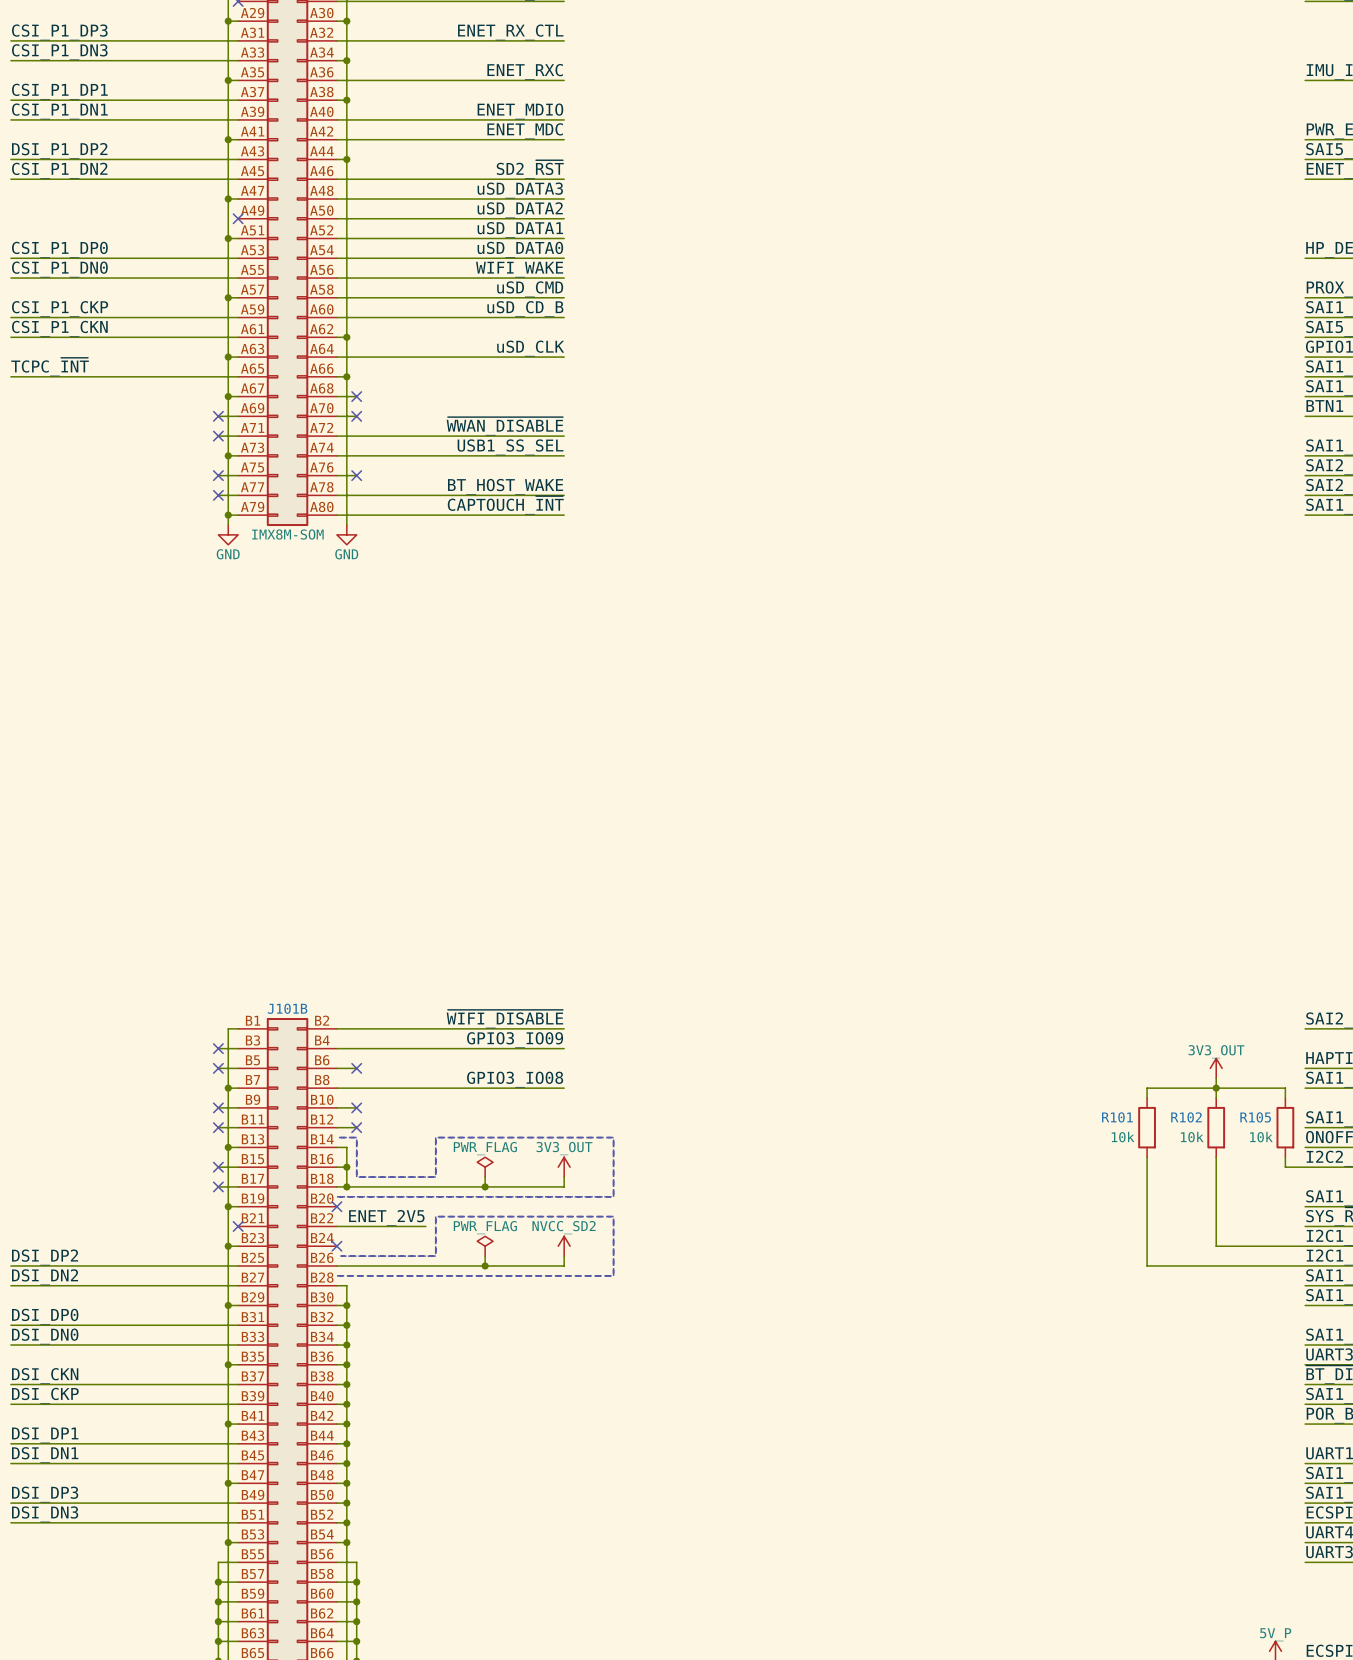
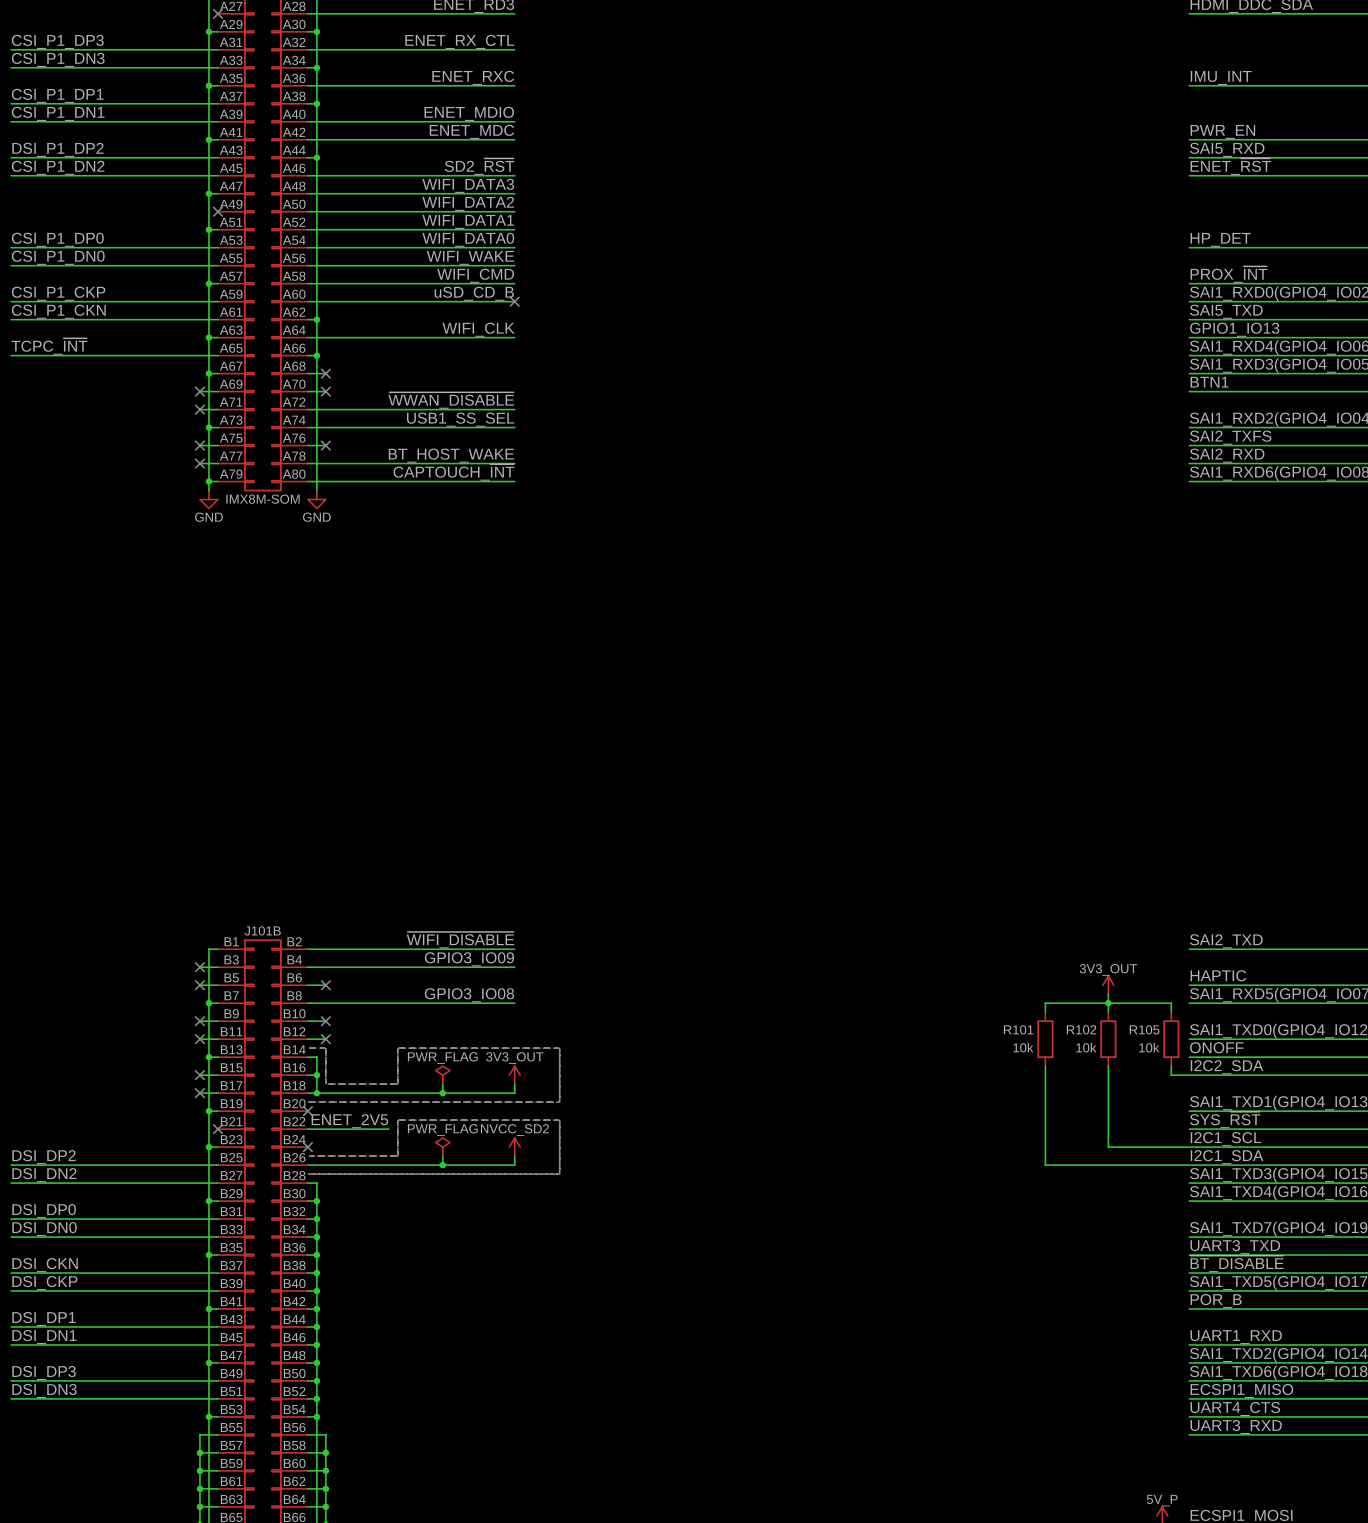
label: uSD_DATA3 (520, 190) -> WIFI_DATA3 (468, 185)
label: uSD_DATA2 (520, 210) -> WIFI_DATA2 (468, 203)
label: uSD_DATA1 (520, 229) -> WIFI_DATA1 (468, 221)
label: uSD_DATA0 (520, 249) -> WIFI_DATA0 (468, 239)
label: uSD_CMD (530, 289) -> WIFI_CMD (475, 275)
no-connect mark: none -> (514, 301)
label: uSD_CLK (530, 348) -> WIFI_CLK (478, 329)

